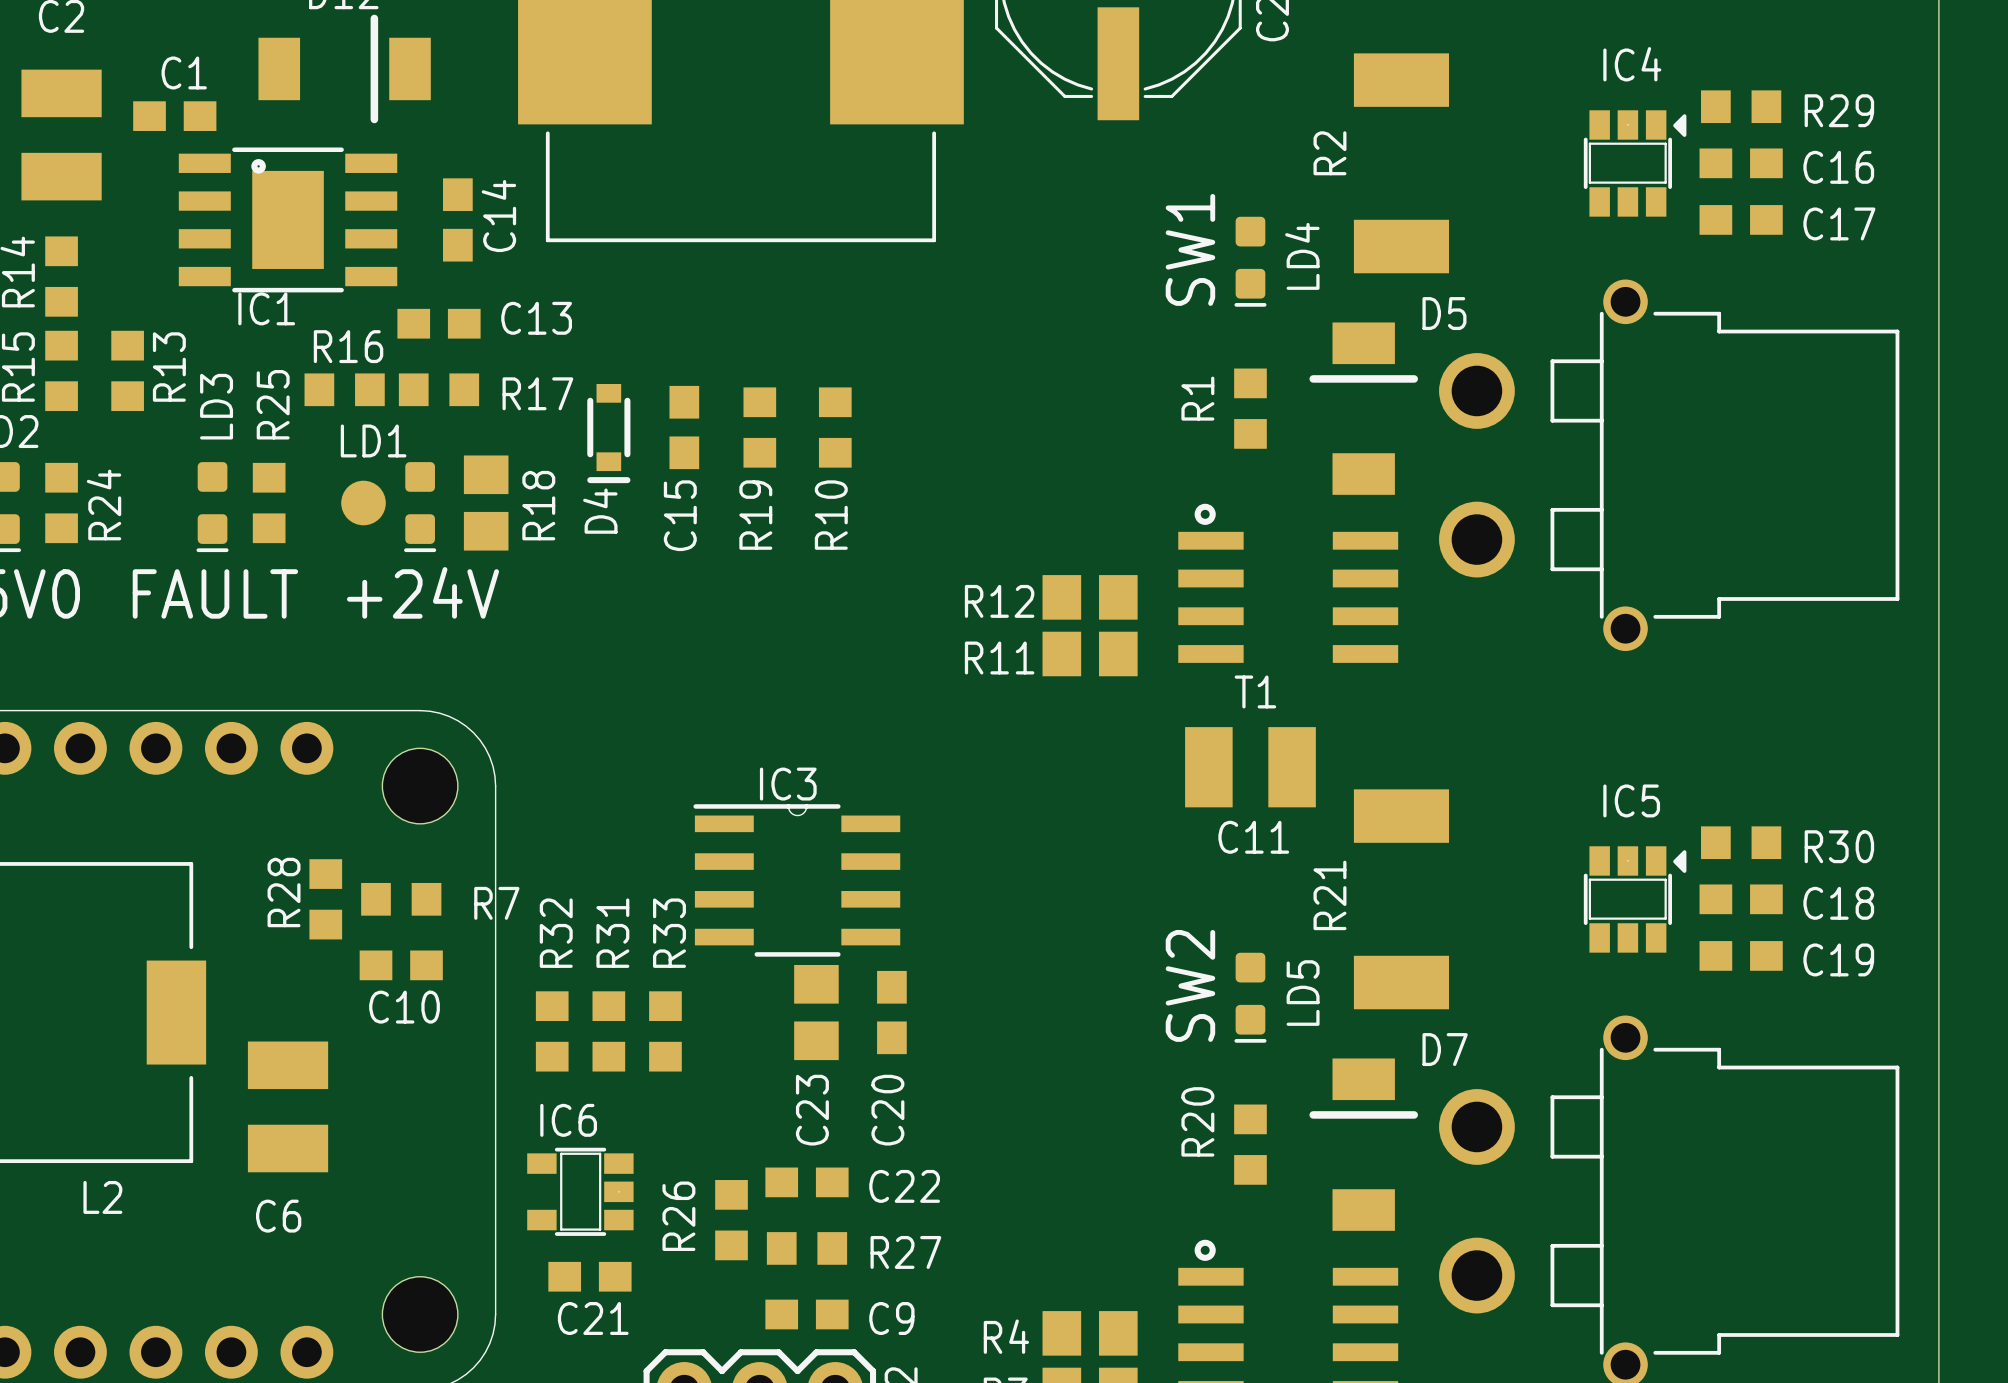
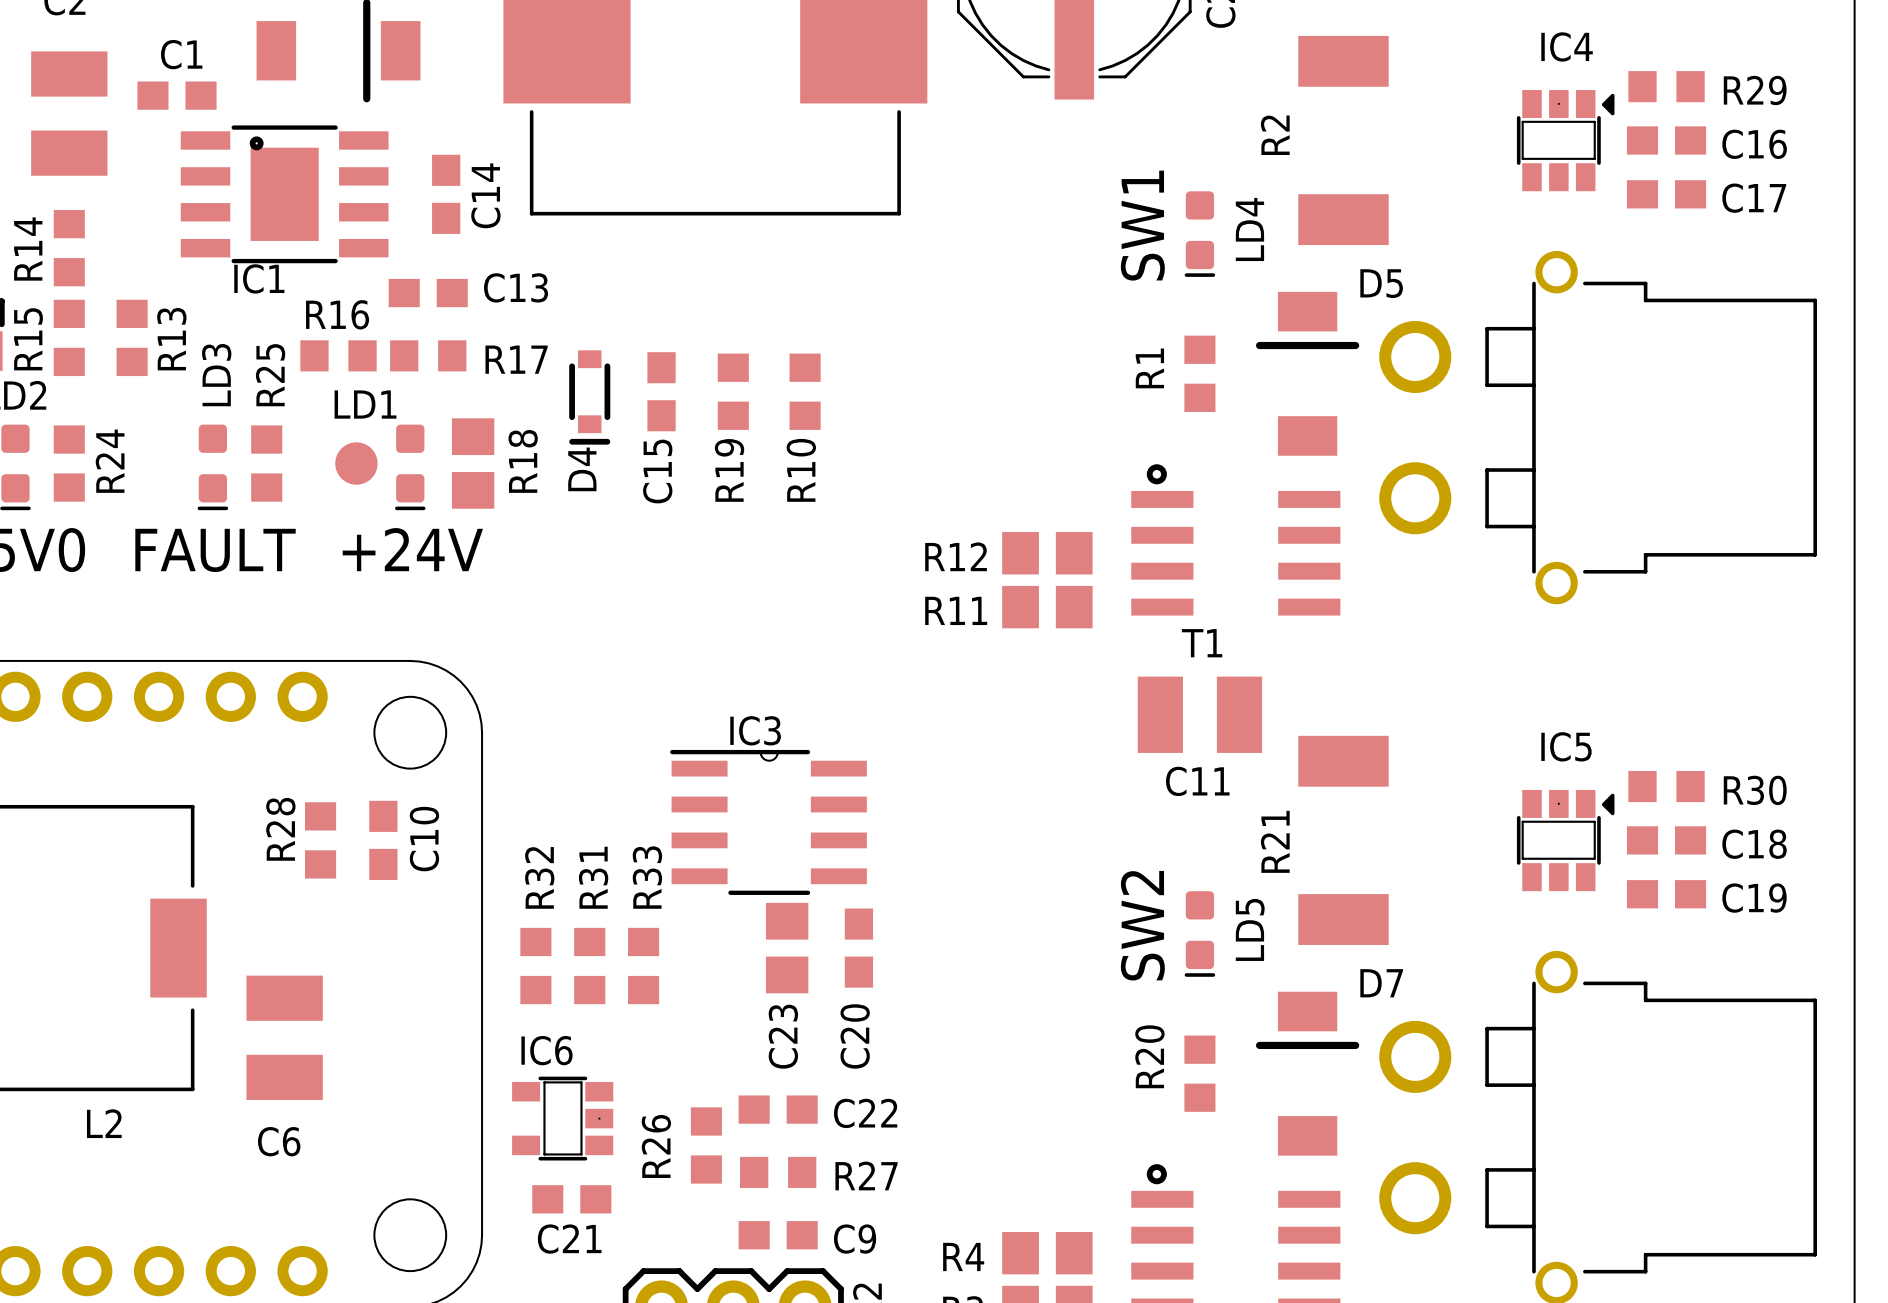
R7: (401, 899) -> none
C10 rotation: 0° (401, 965) -> 90° clockwise (383, 840)
C10 position: (401, 965) -> (383, 840)

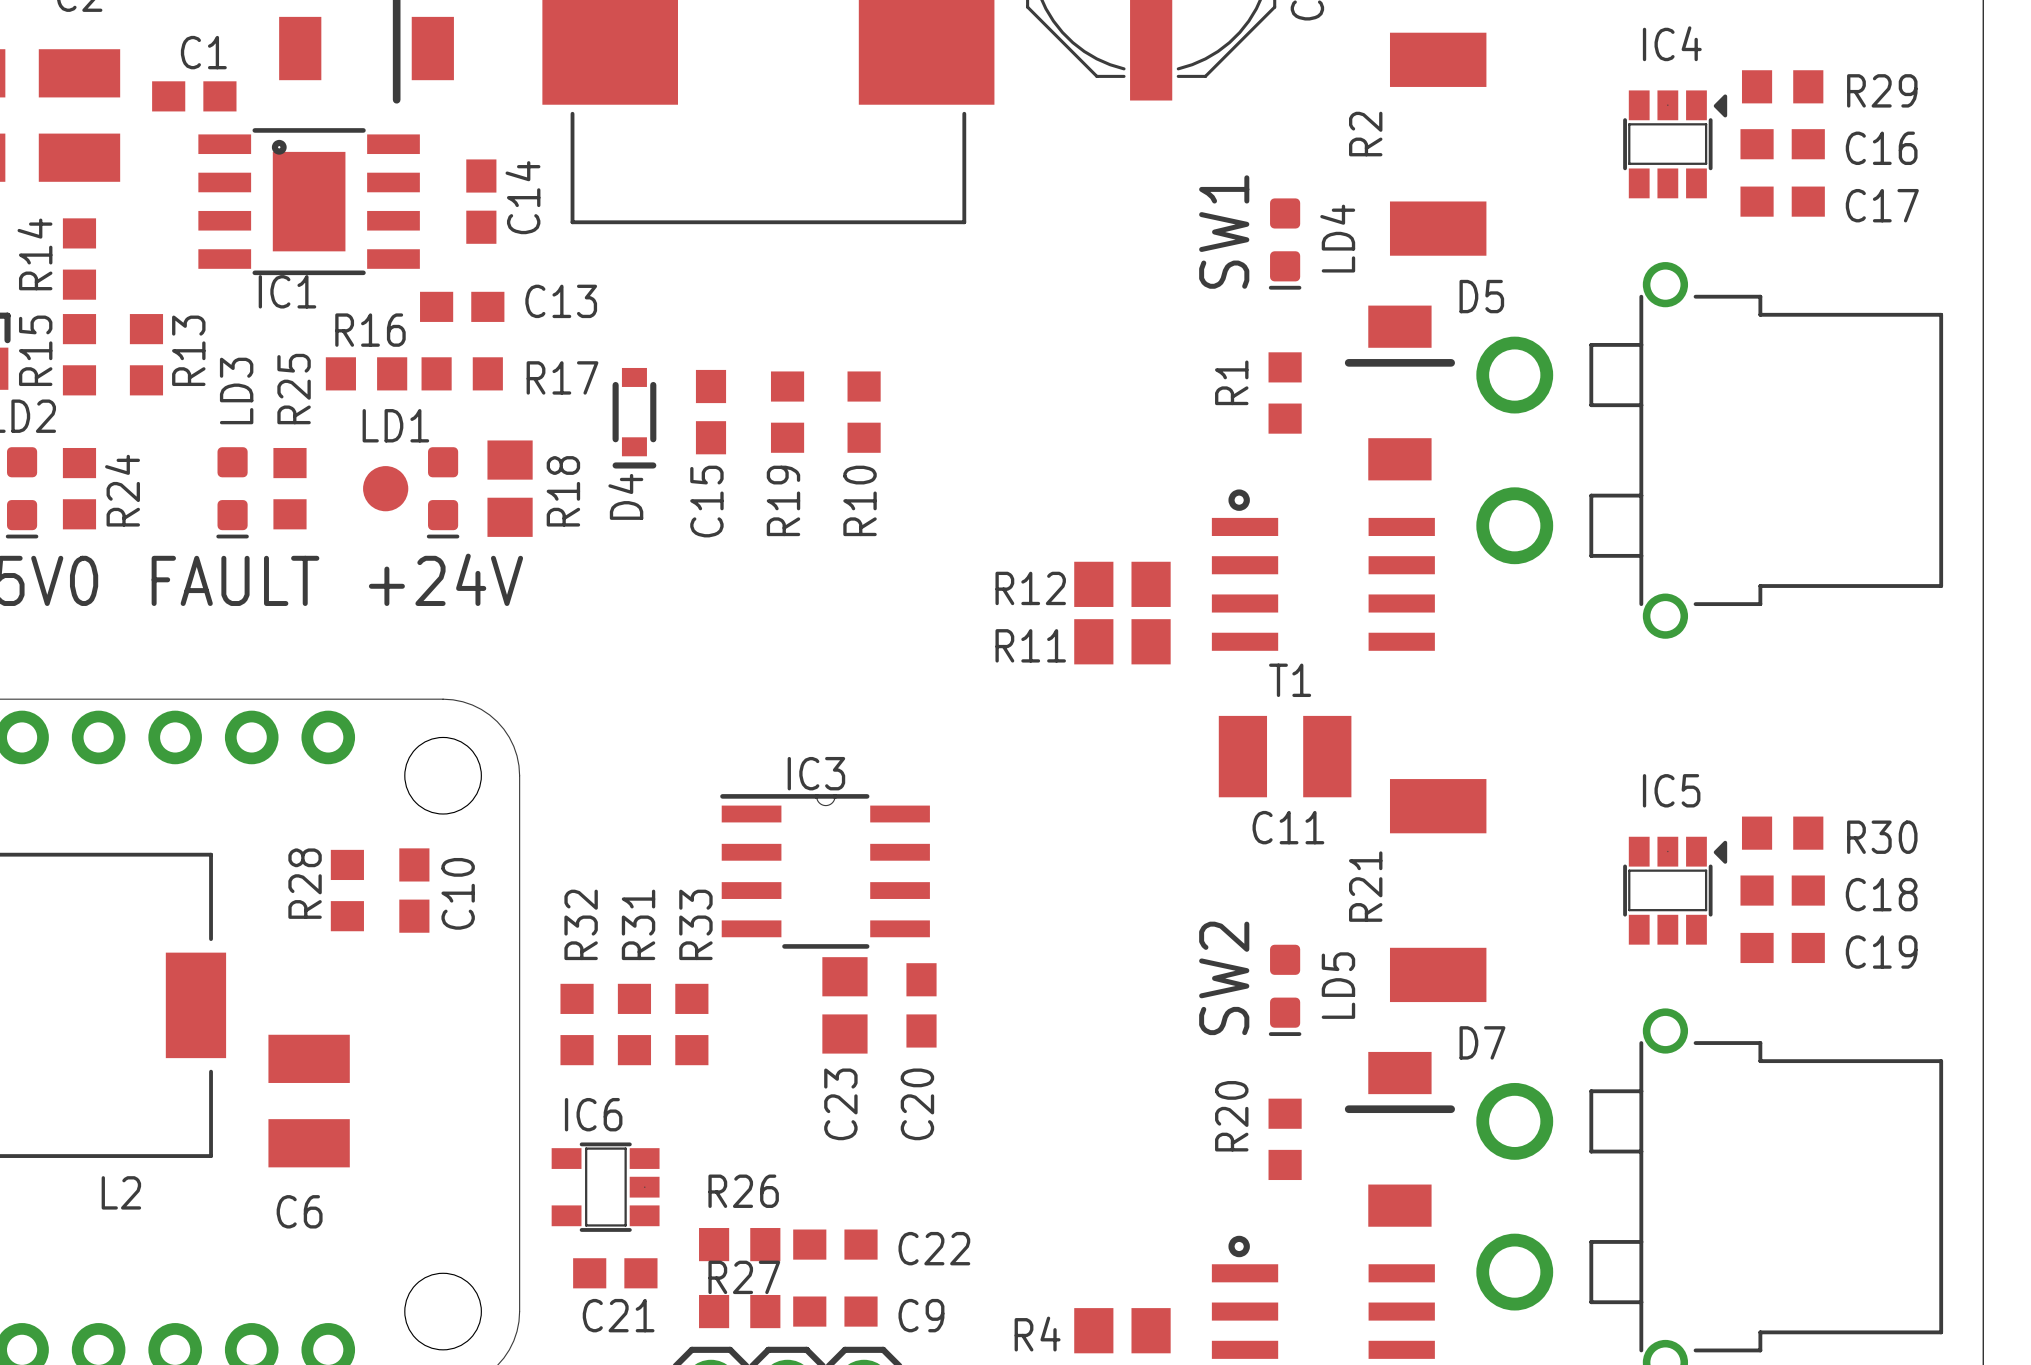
C22 position: (778, 1109) -> (835, 1244)
R26 rotation: 0° (706, 1145) -> 90° clockwise (739, 1244)
R27 position: (778, 1172) -> (739, 1311)
R27 name position: R27 (866, 1175) -> R27 (744, 1277)

